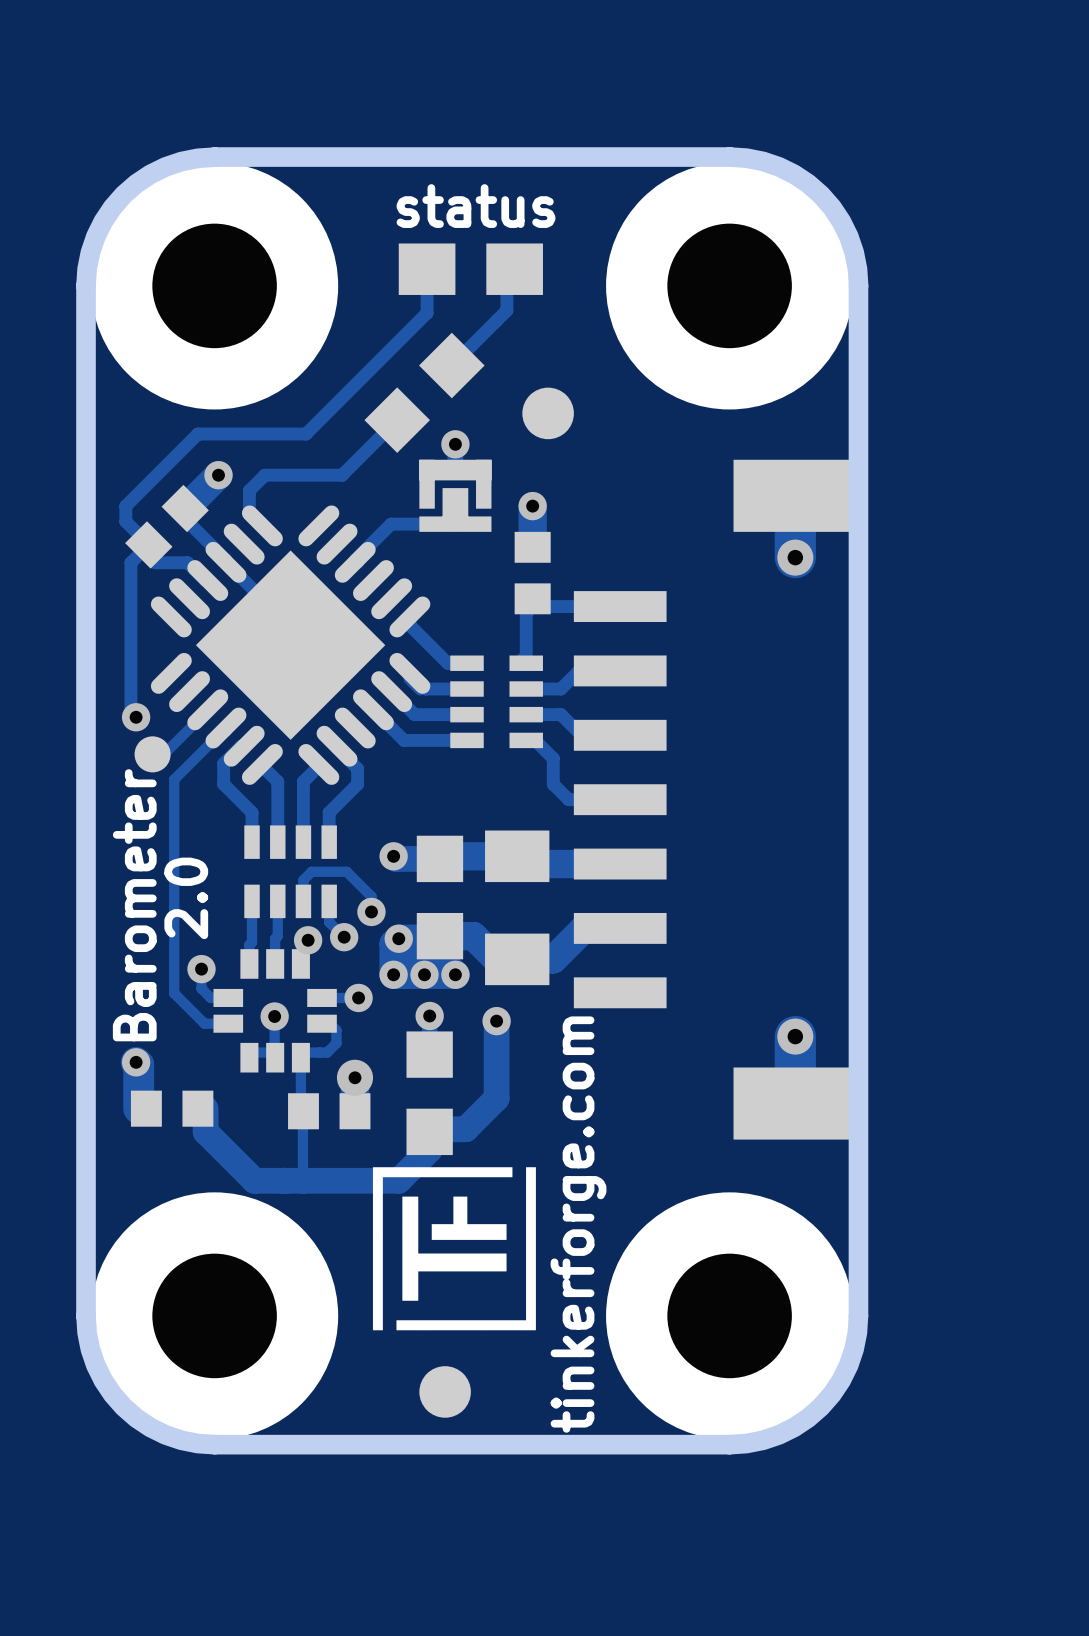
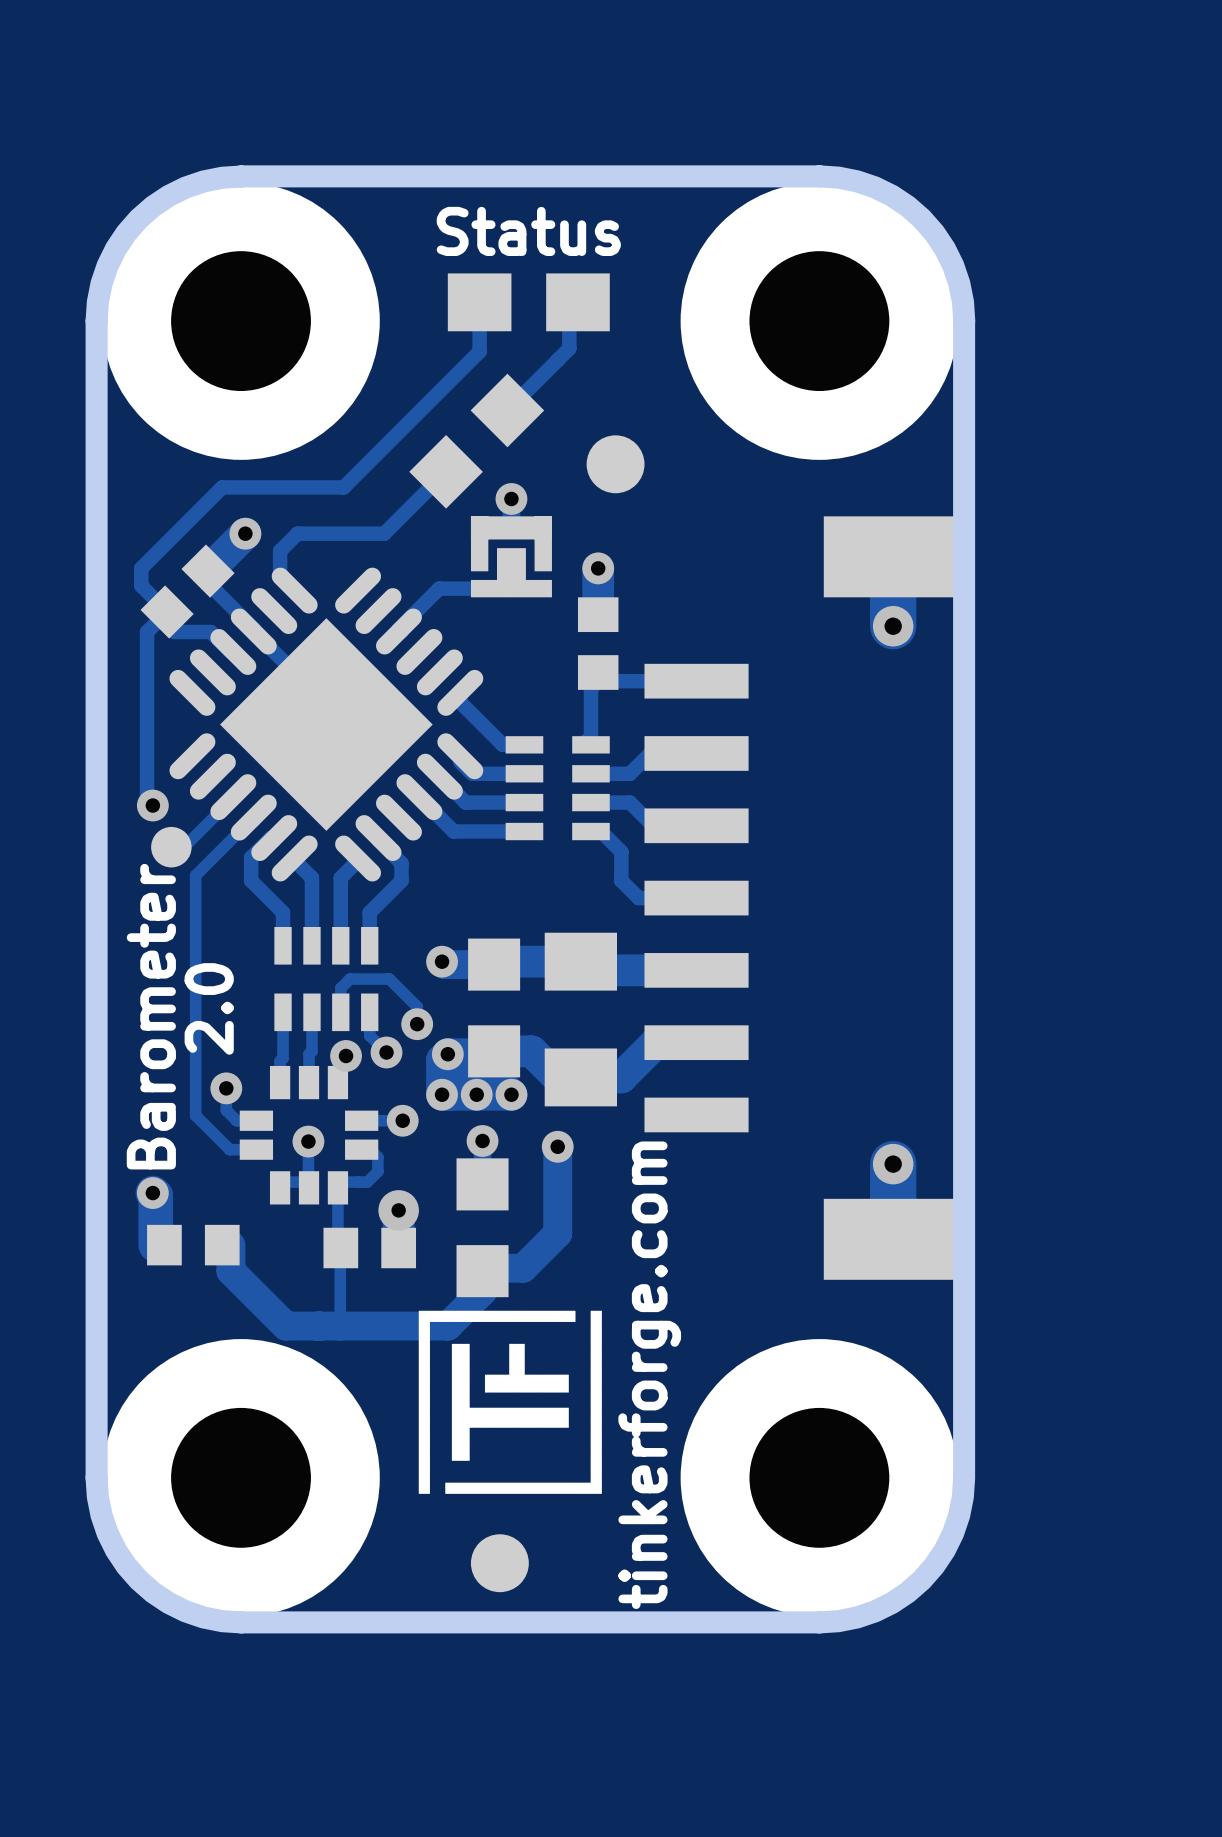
text: status (476, 206) -> Status (528, 231)

